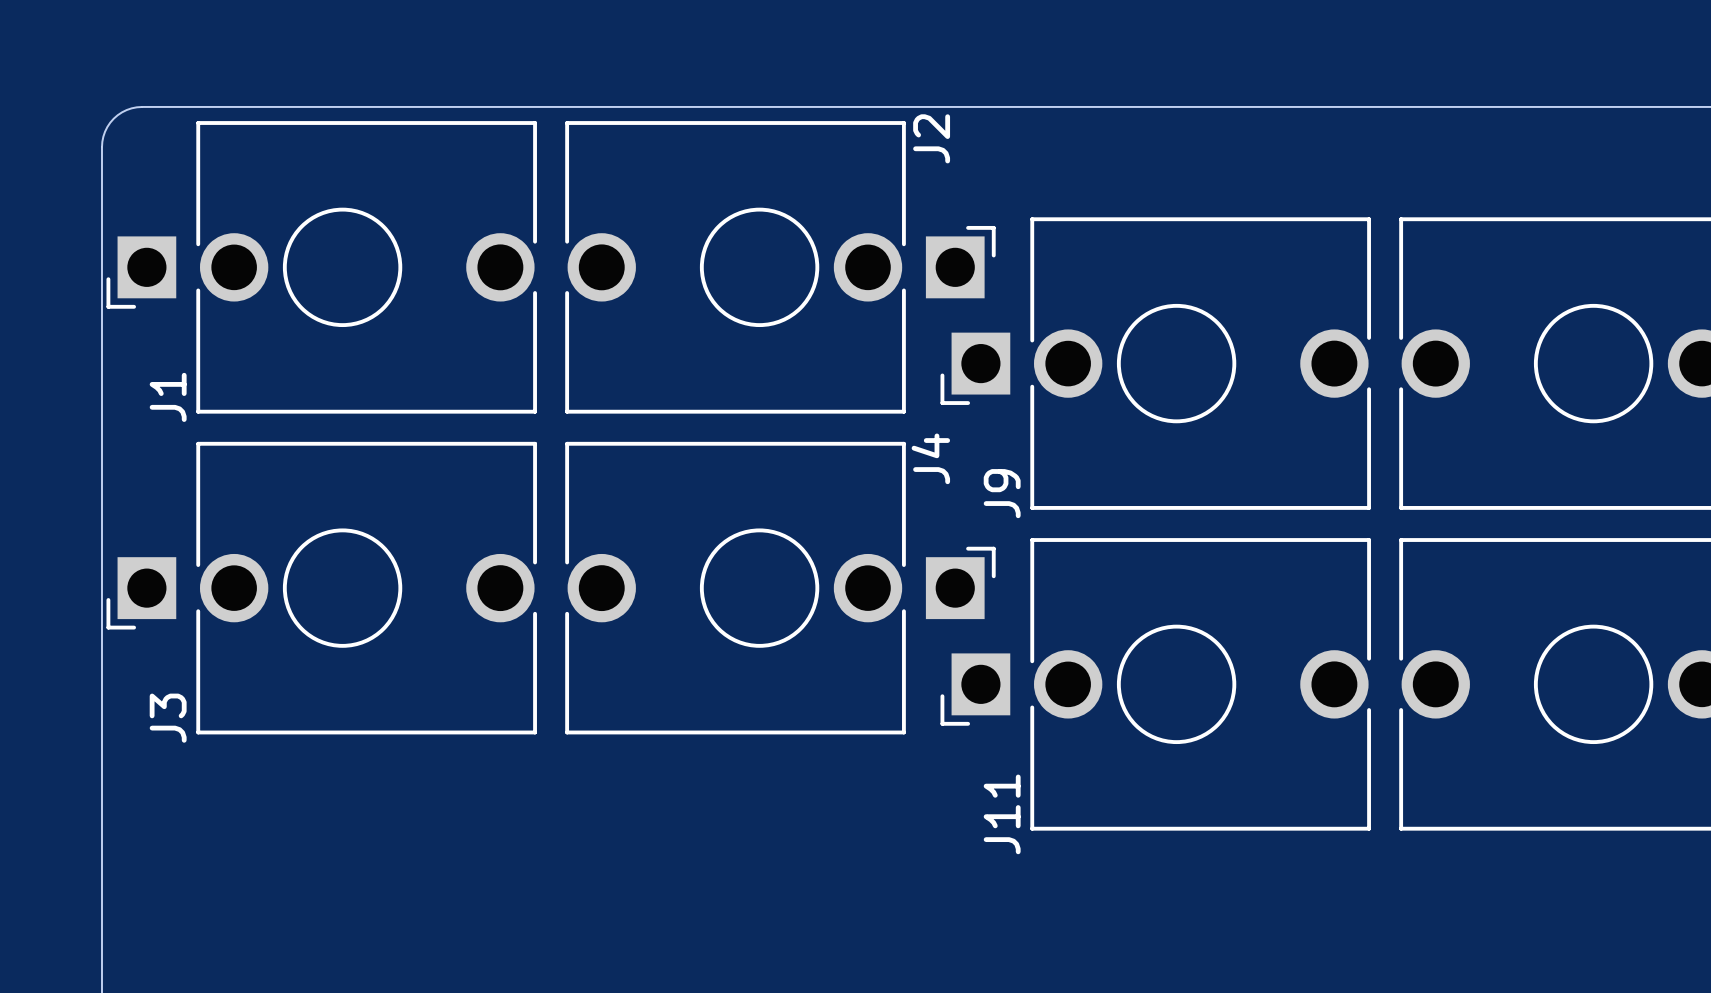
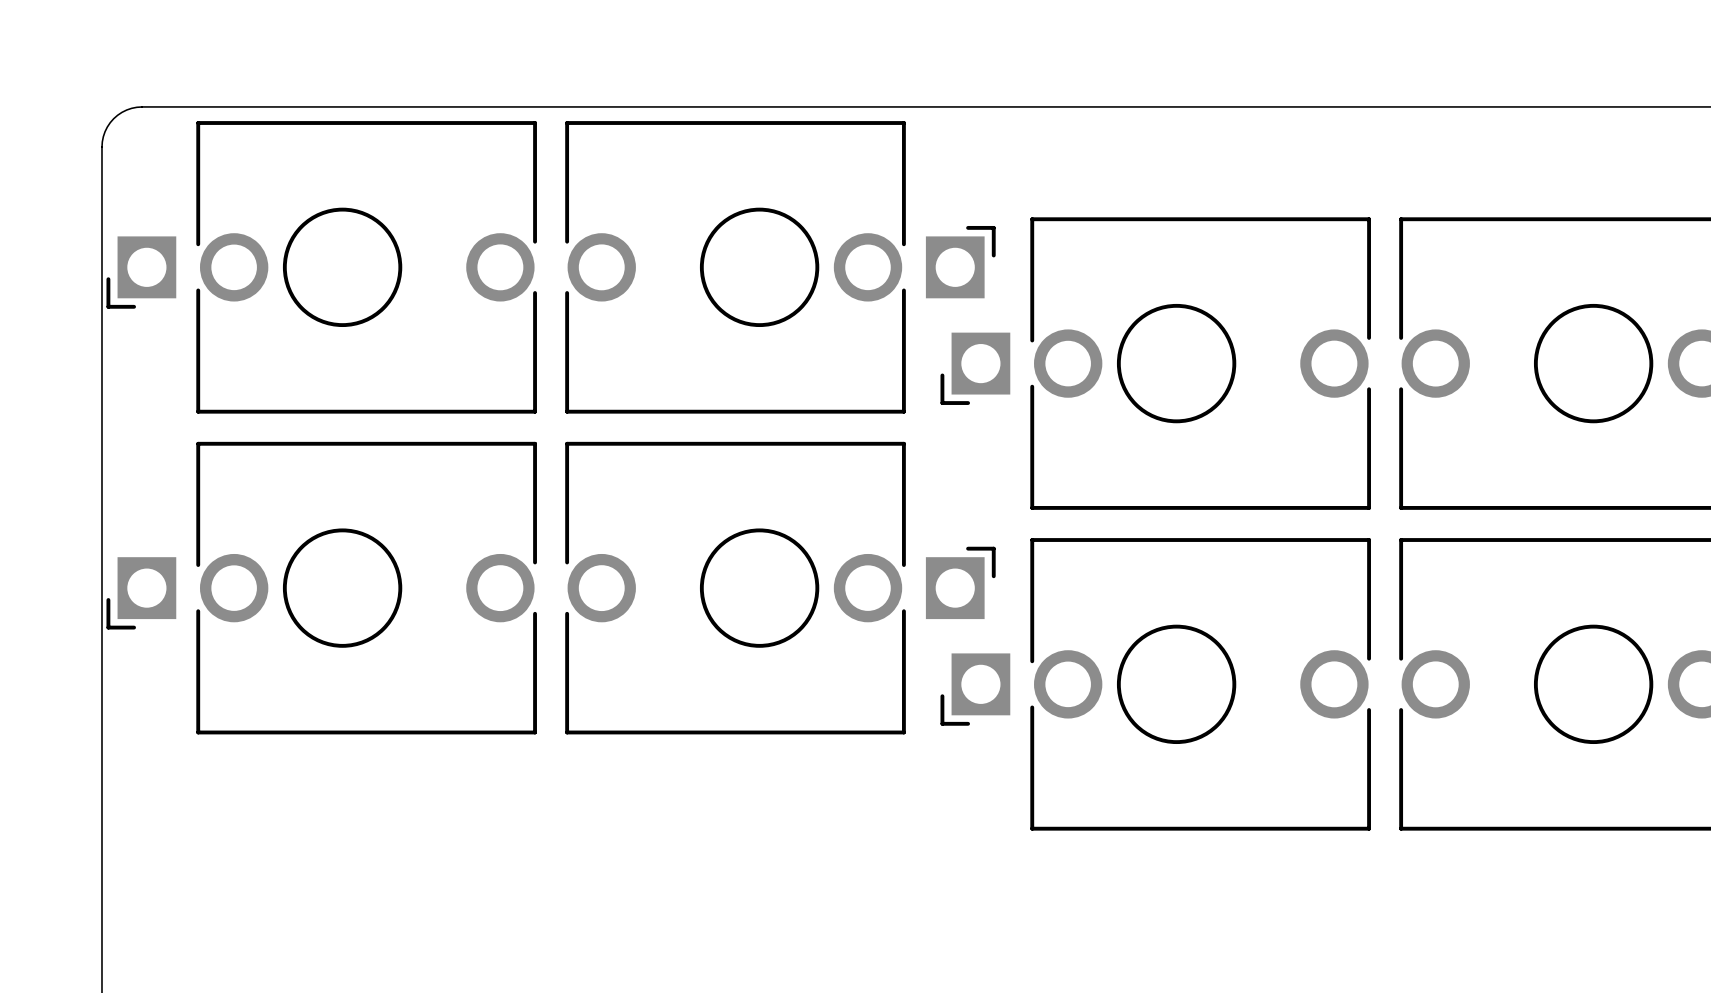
J2 name: J2 (931, 138) -> none
J1 name: J1 (168, 397) -> none
J4 name: J4 (930, 458) -> none
J9 name: J9 (1002, 493) -> none
J3 name: J3 (168, 718) -> none
J11 name: J11 (1002, 814) -> none

